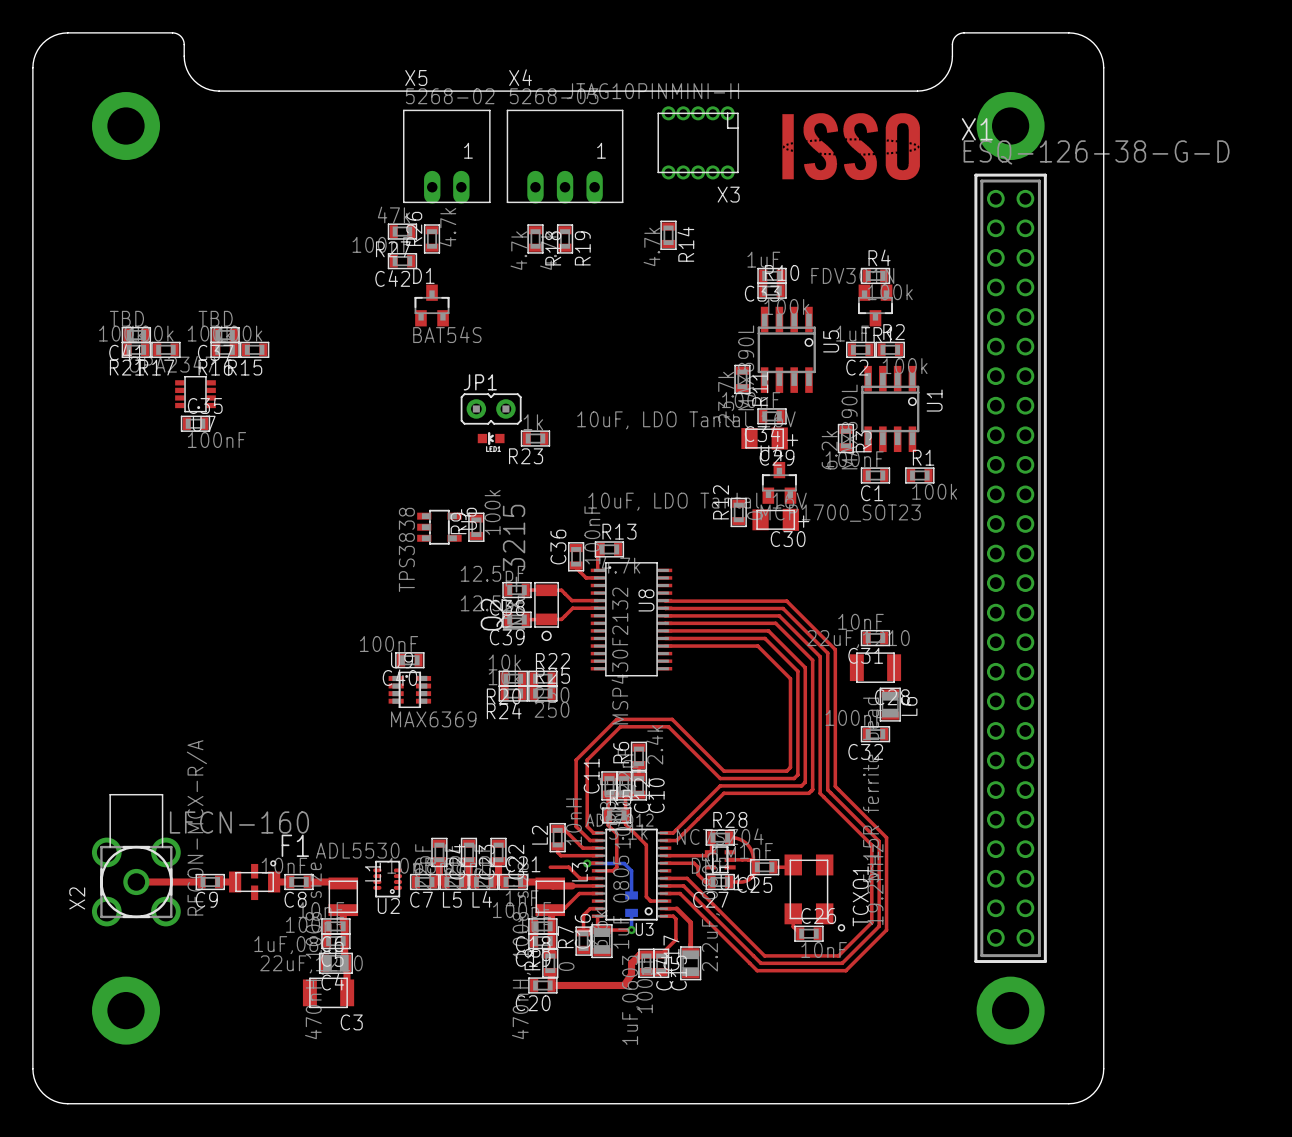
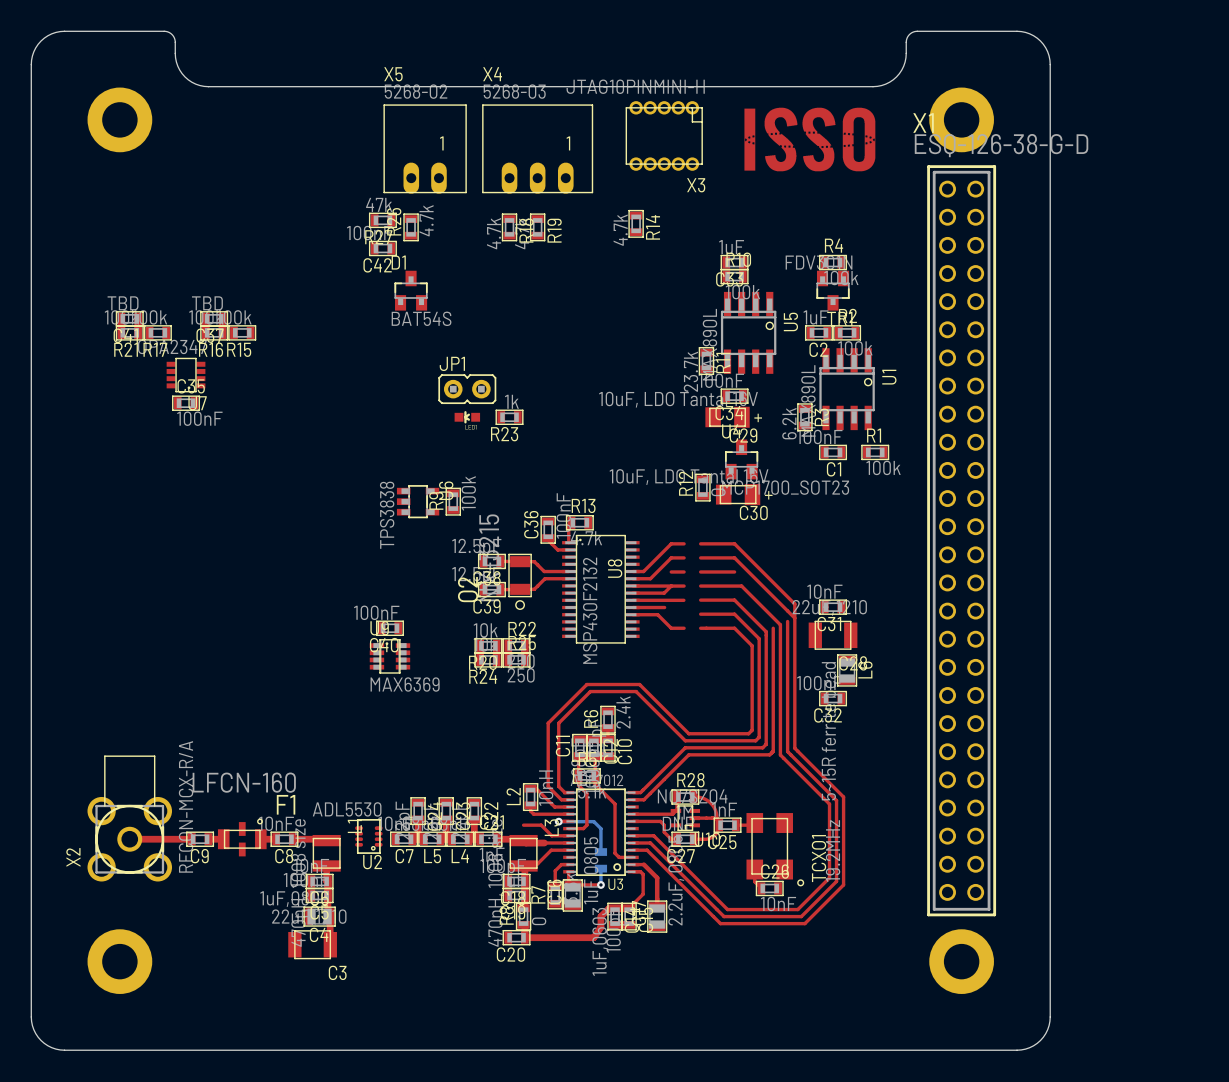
top track: none -> (700, 543) (734, 543) (794, 604) (794, 618)
top track: (665, 600) (705, 601) -> (632, 571) (643, 571) (671, 543) (684, 543)
top track: (718, 601) (736, 601) -> none
top track: (772, 601) (786, 601) -> (700, 557) (734, 557) (748, 571)
top track: (665, 608) (783, 608) (827, 653) -> (632, 578) (650, 578) (671, 557) (684, 557)
top track: (718, 615) (736, 615) -> none
top track: (698, 623) (775, 623) (812, 660) -> (664, 593) (671, 586)
top track: (718, 630) (768, 630) (805, 667) -> (700, 600) (734, 600) (766, 631) (766, 635)
top track: (698, 638) (765, 638) (772, 645) -> (700, 614) (734, 614)
top track: (691, 646) (757, 646) (772, 660) -> (700, 628) (734, 628)
top track: none -> (657, 614) (671, 628) (684, 628)

